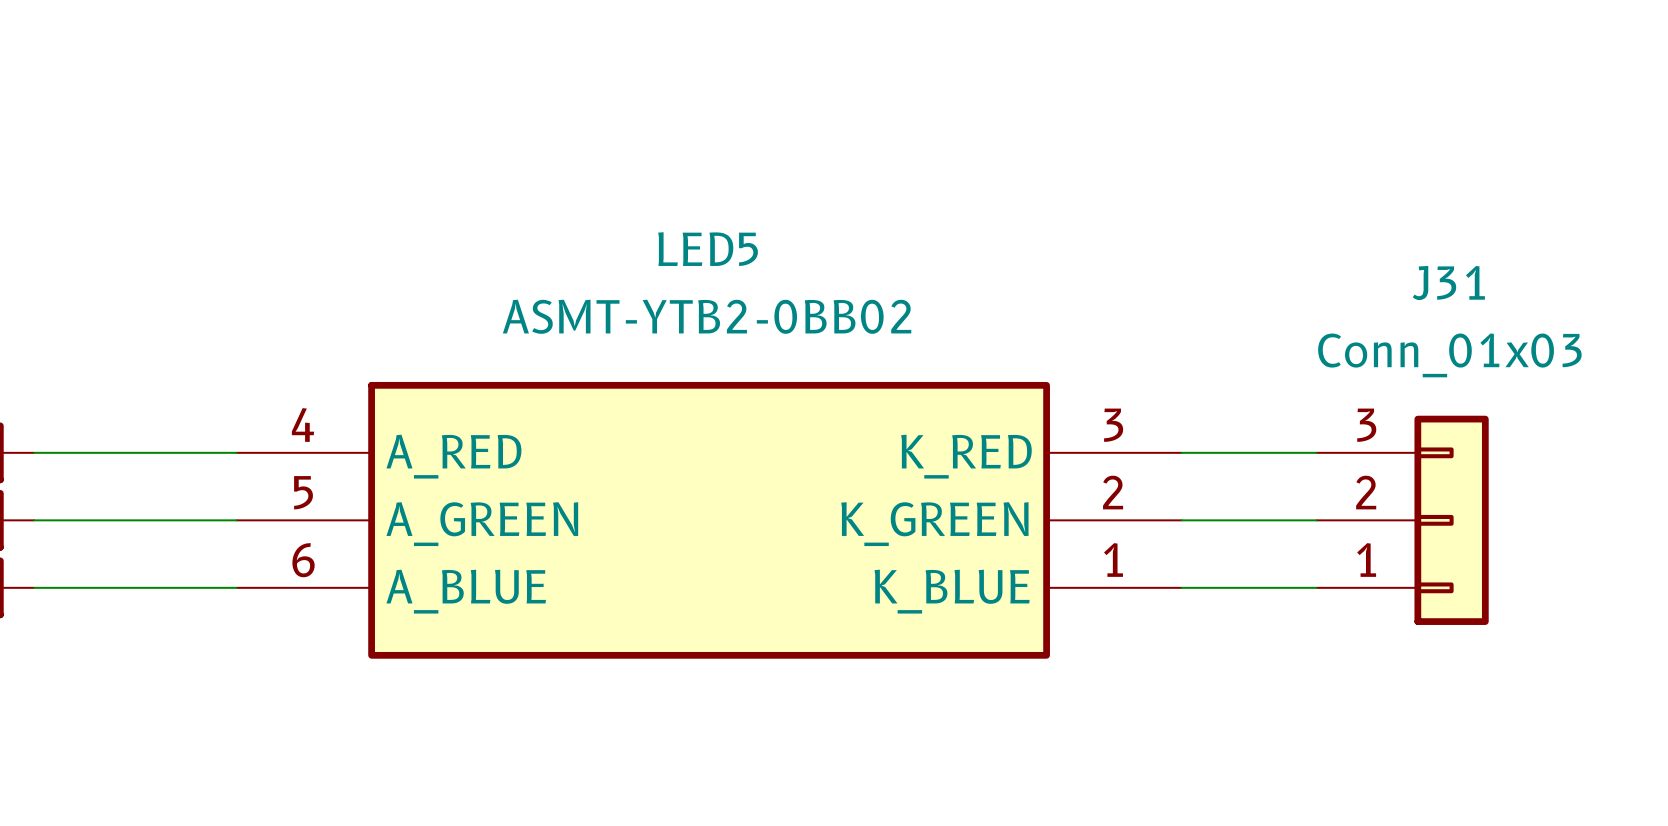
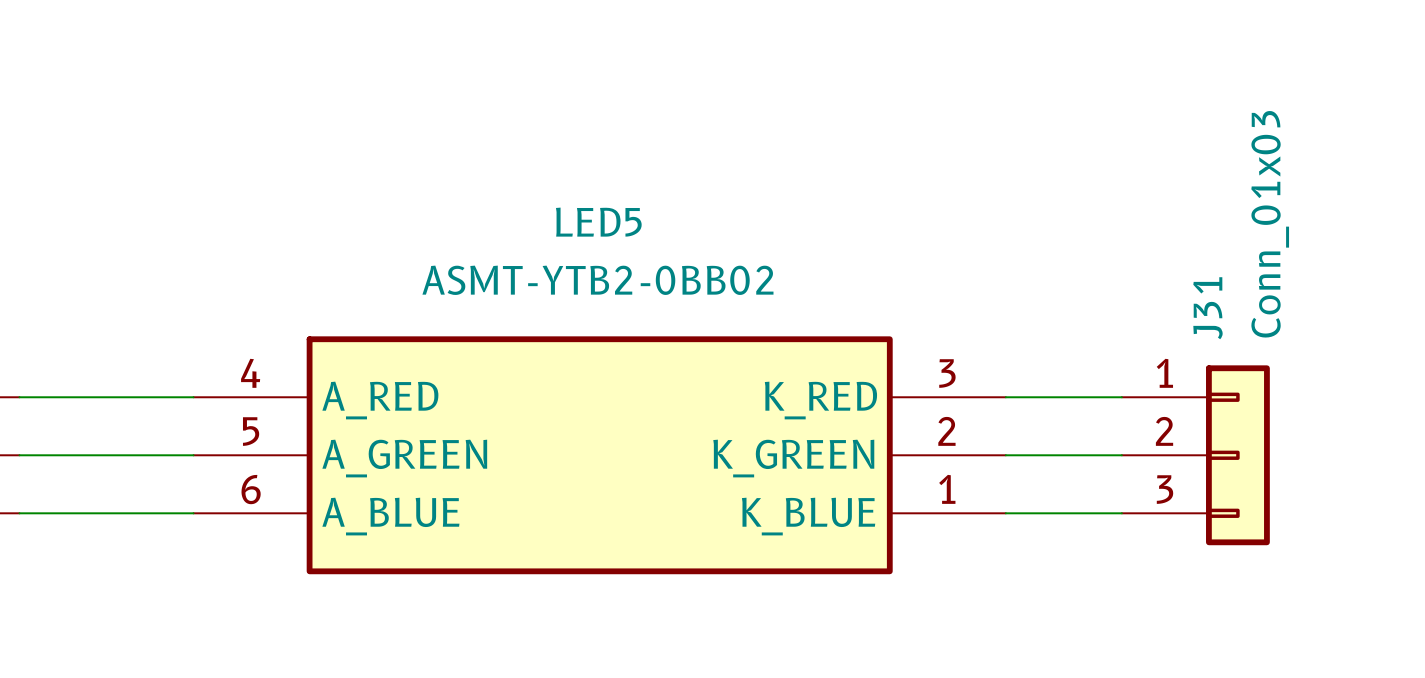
J31 name position: J31 (1448, 283) -> J31 (1207, 308)
J31 value position: Conn_01x03 (1449, 355) -> Conn_01x03 (1270, 224)
J31 flip: as is (1451, 520) -> up-down (1237, 455)

